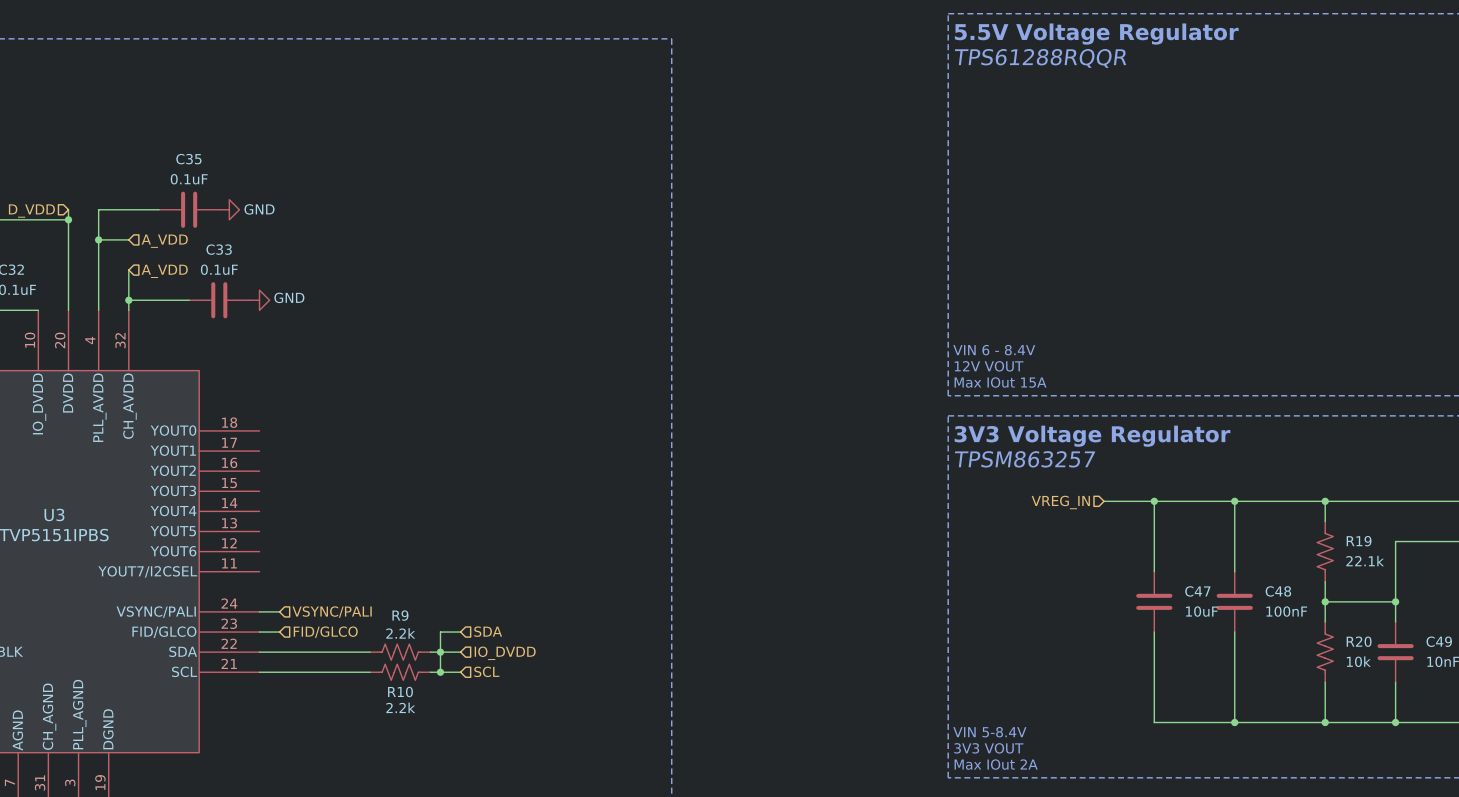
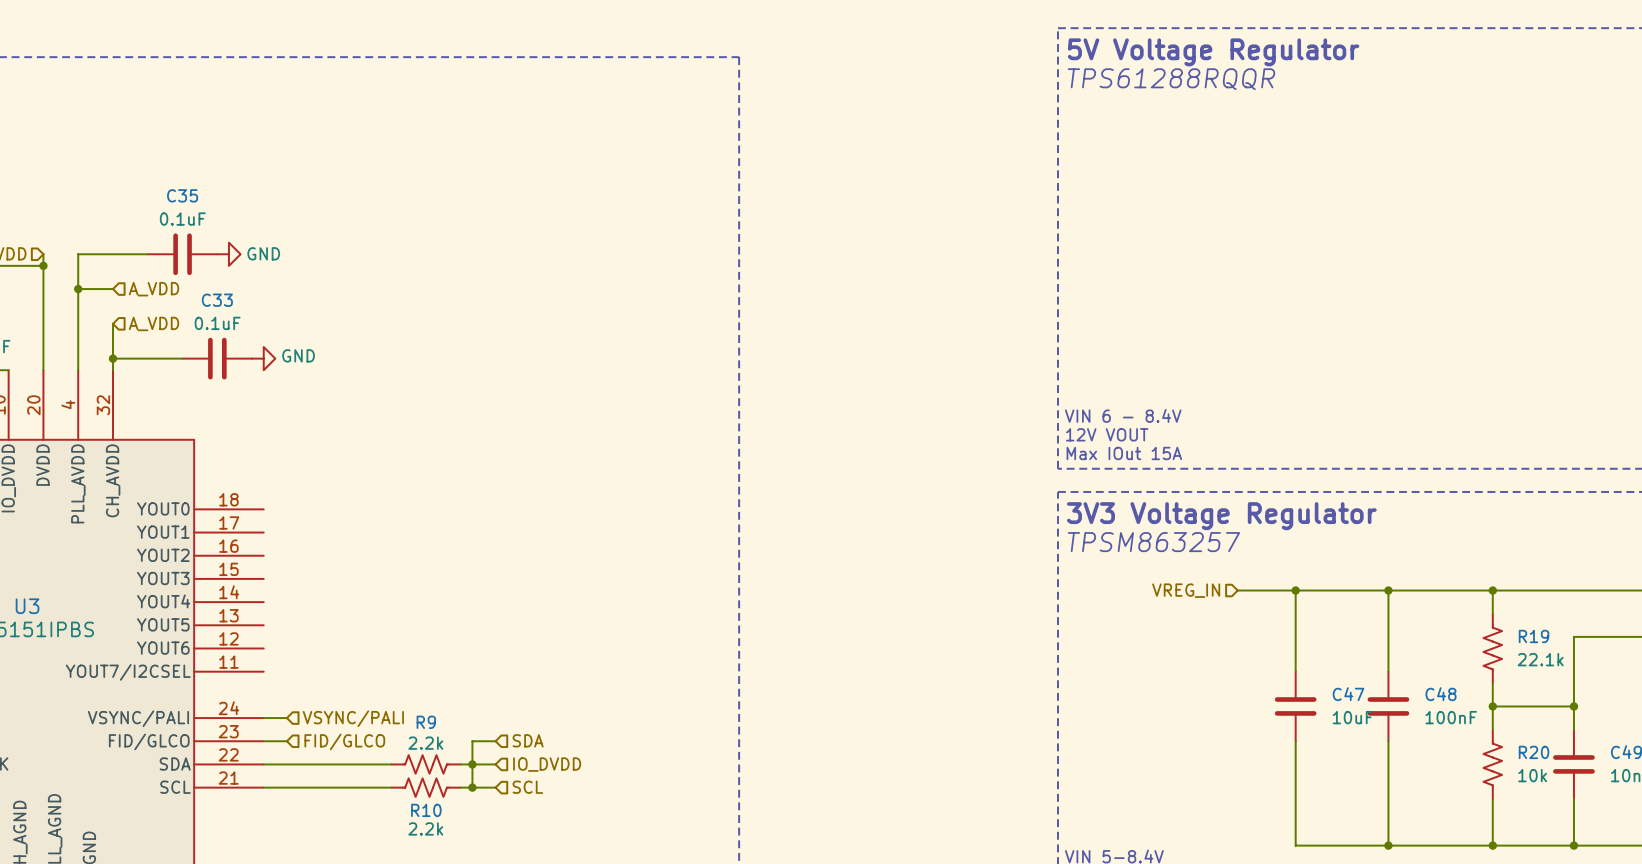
text: 5.5V Voltage Regulator (1096, 34) -> 5V Voltage Regulator (1213, 52)

